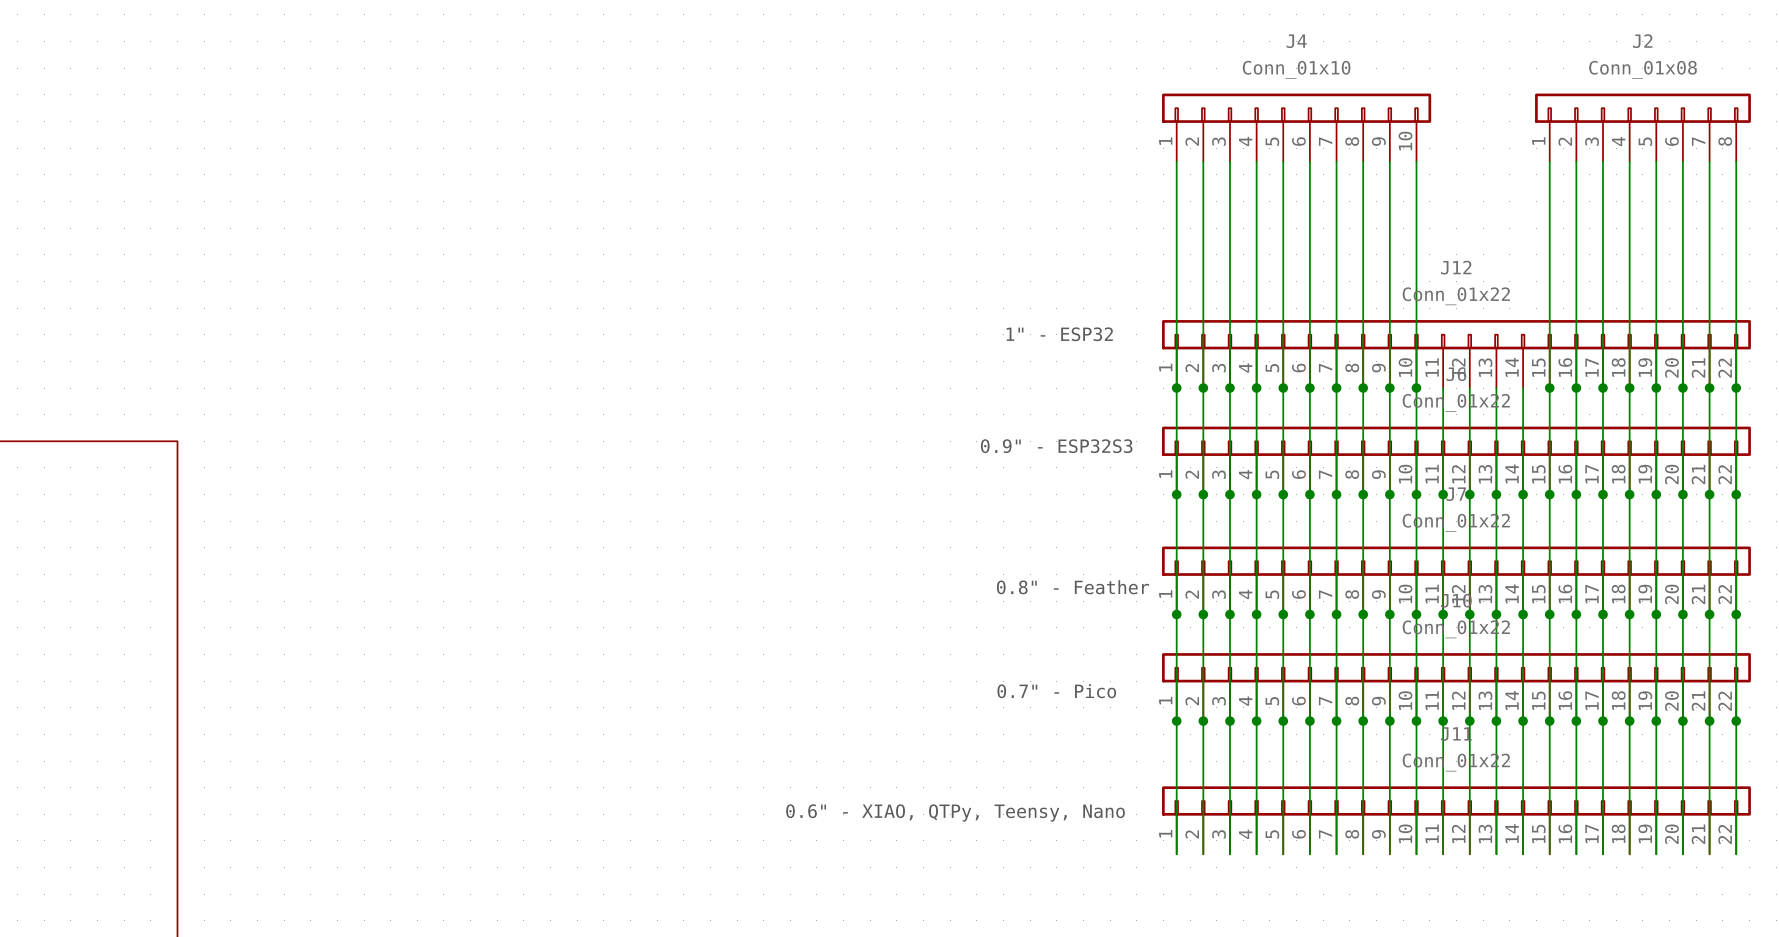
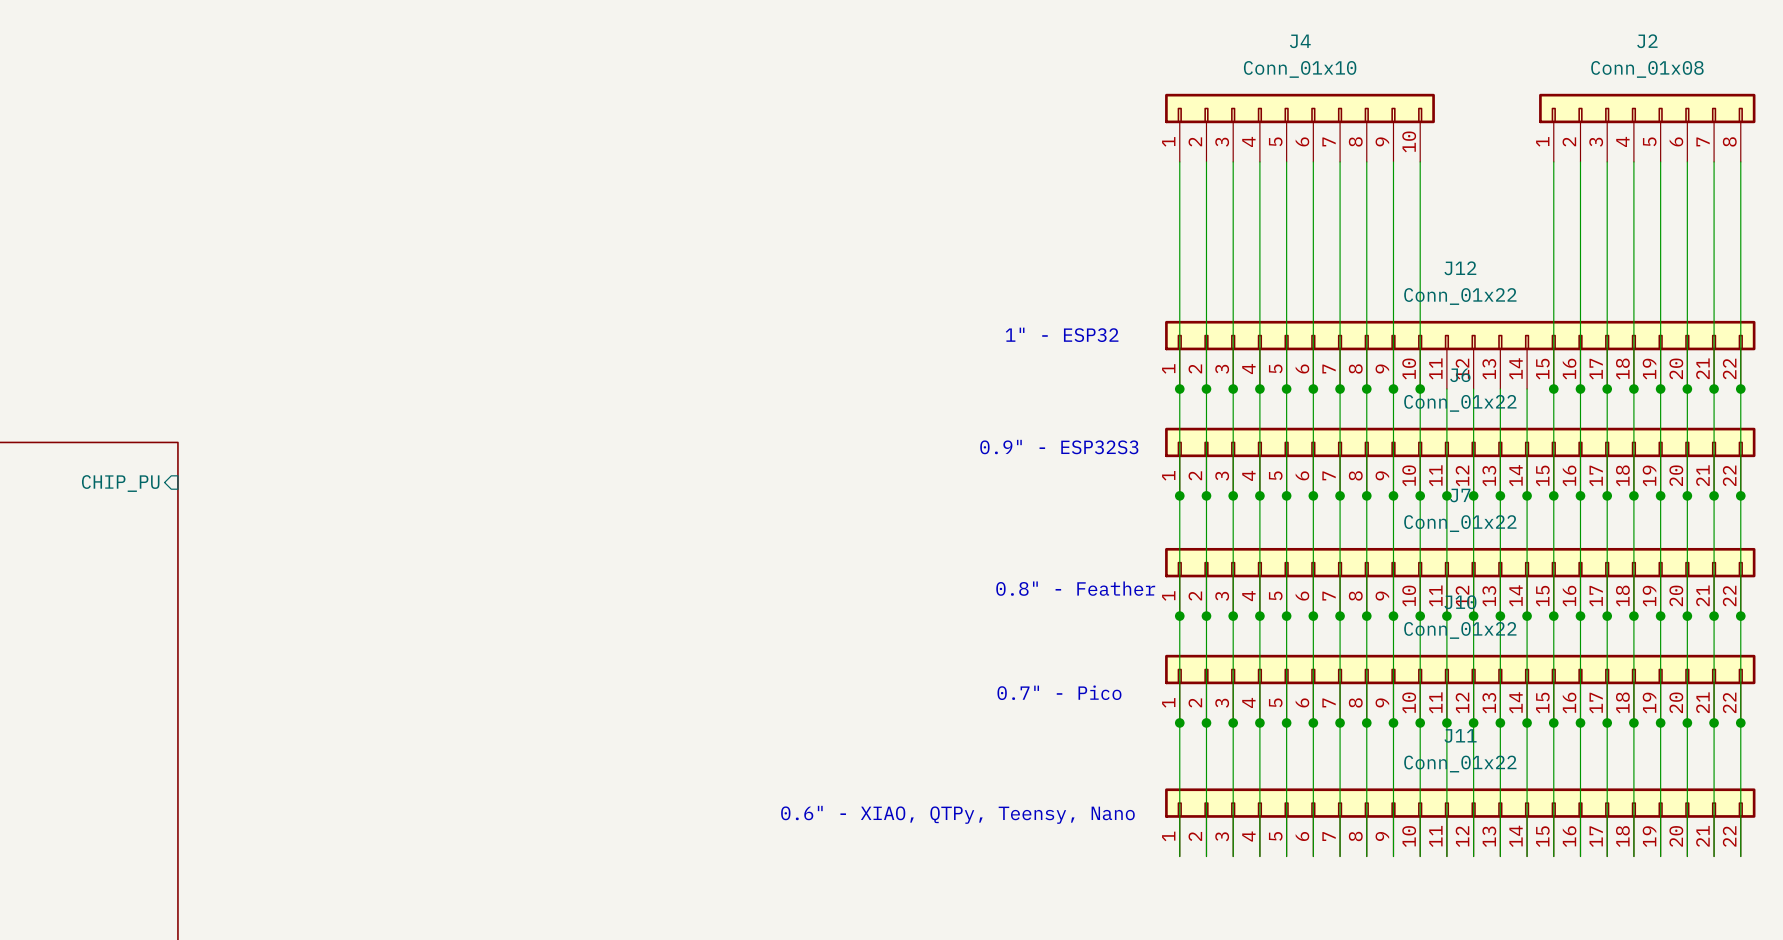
sheet pin: none -> CHIP_PU (120, 483)

